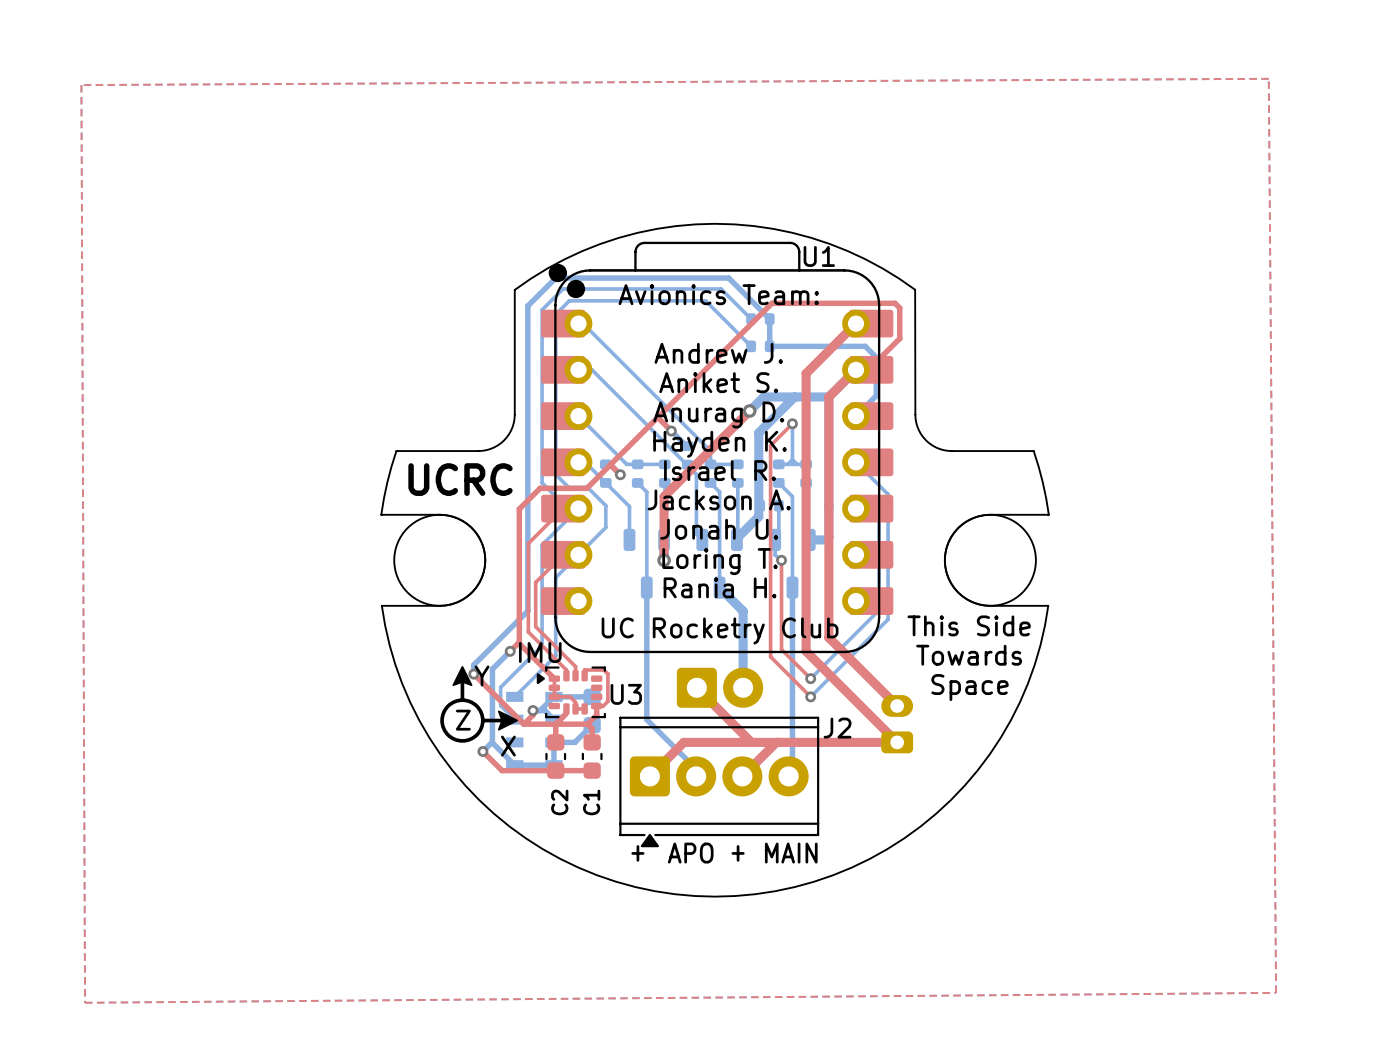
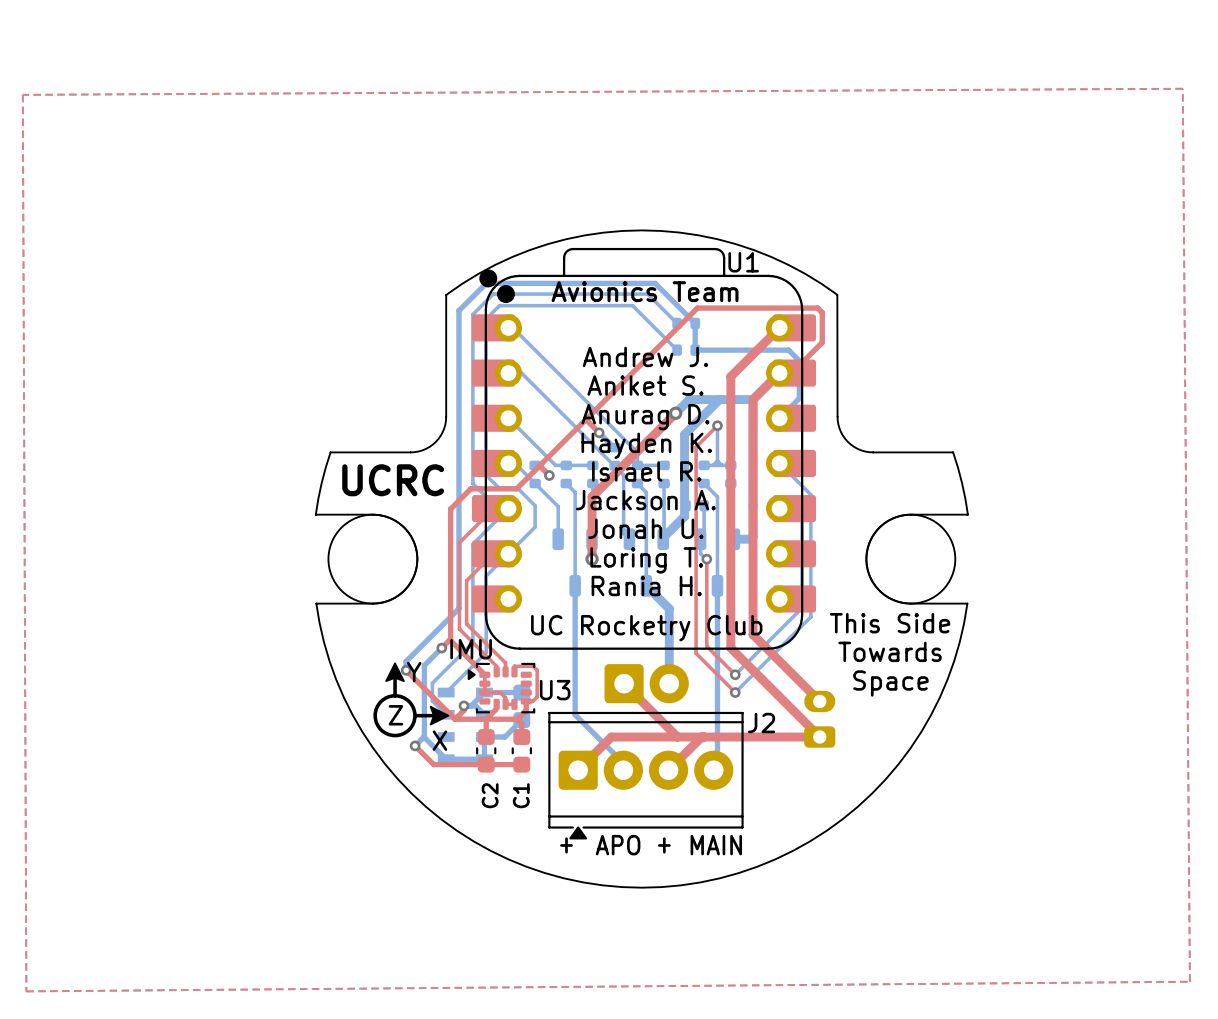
text: Avionics Team: (718, 294) -> Avionics Team (645, 291)

